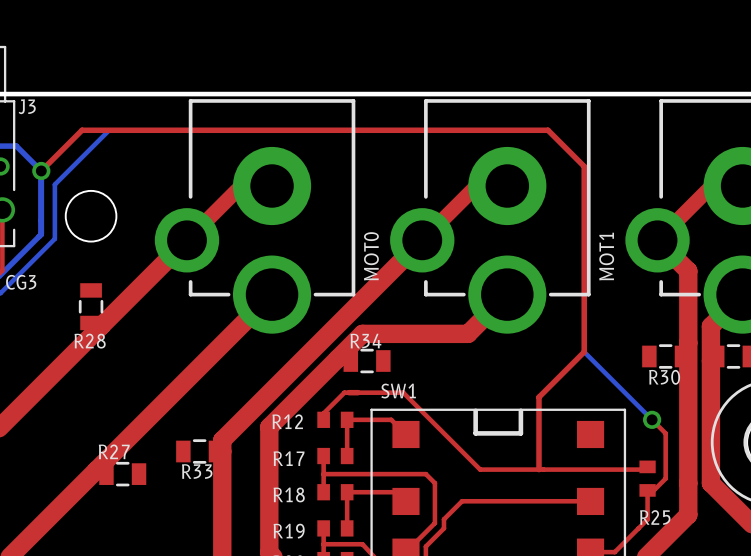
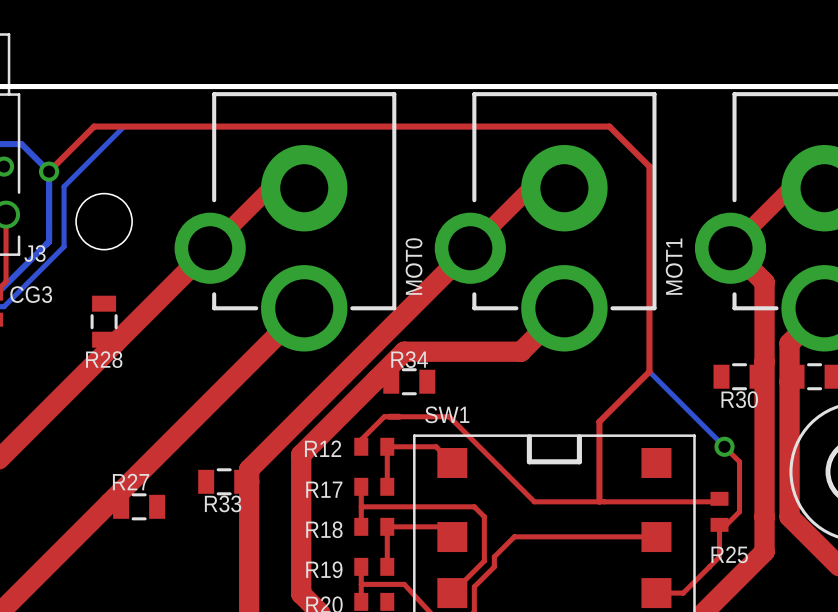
J3 name position: J3 (27, 106) -> J3 (34, 253)

